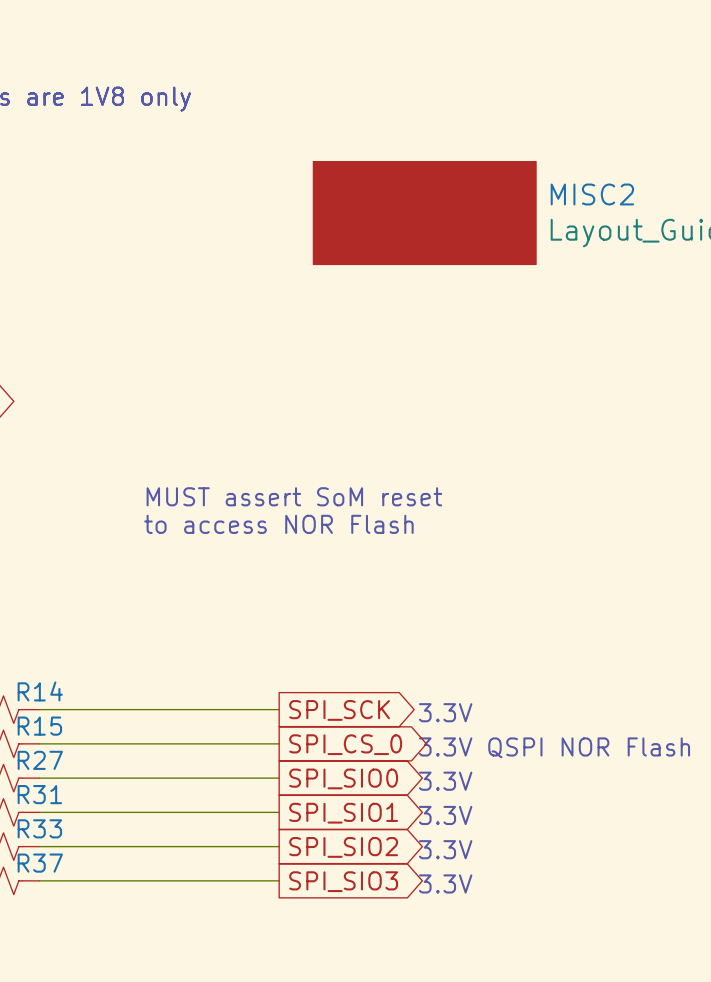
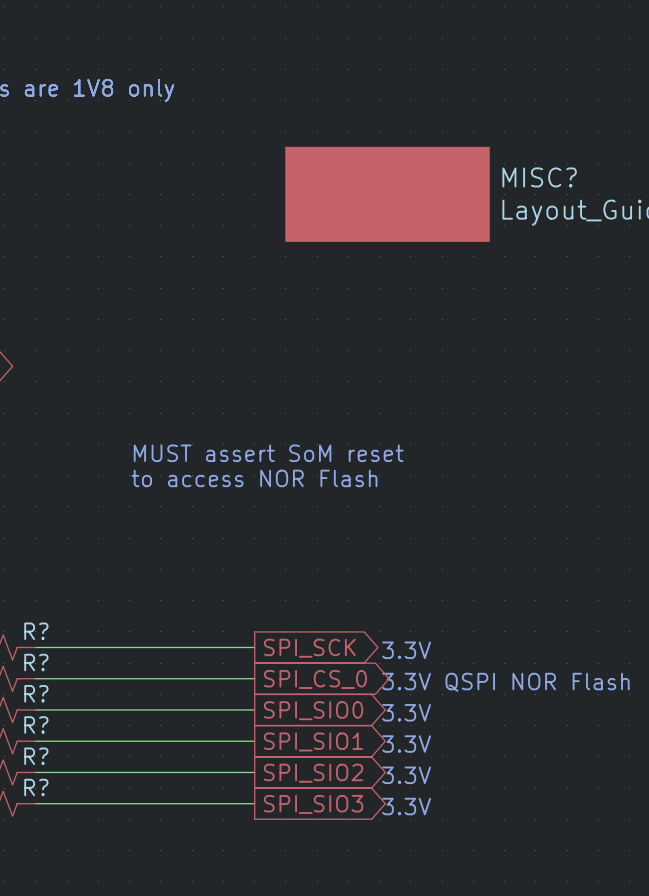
MISC2 name: MISC2 (592, 194) -> MISC? (539, 177)
R14 name: R14 (40, 691) -> R? (36, 631)
R15 name: R15 (39, 726) -> R? (36, 662)
R27 name: R27 (40, 760) -> R? (36, 693)
R31 name: R31 (39, 794) -> R? (36, 725)
R33 name: R33 (39, 828) -> R? (36, 756)
R37 name: R37 (40, 863) -> R? (36, 787)

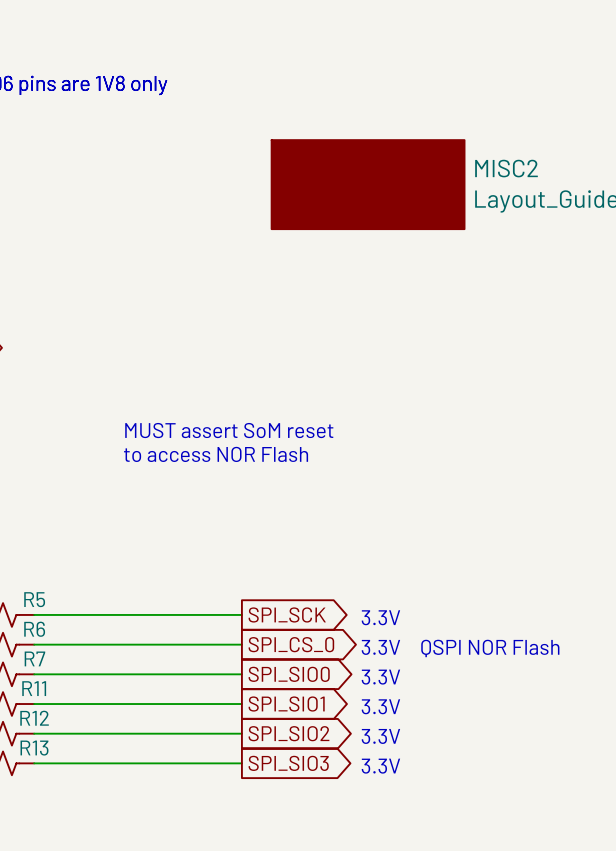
MISC? name: MISC? (539, 177) -> MISC2 (506, 168)
R? name: R? (36, 631) -> R5 (34, 599)
R? name: R? (36, 662) -> R6 (34, 629)
R? name: R? (36, 693) -> R7 (34, 658)
R? name: R? (36, 725) -> R11 (34, 688)
R? name: R? (36, 756) -> R12 (34, 718)
R? name: R? (36, 787) -> R13 (34, 748)

